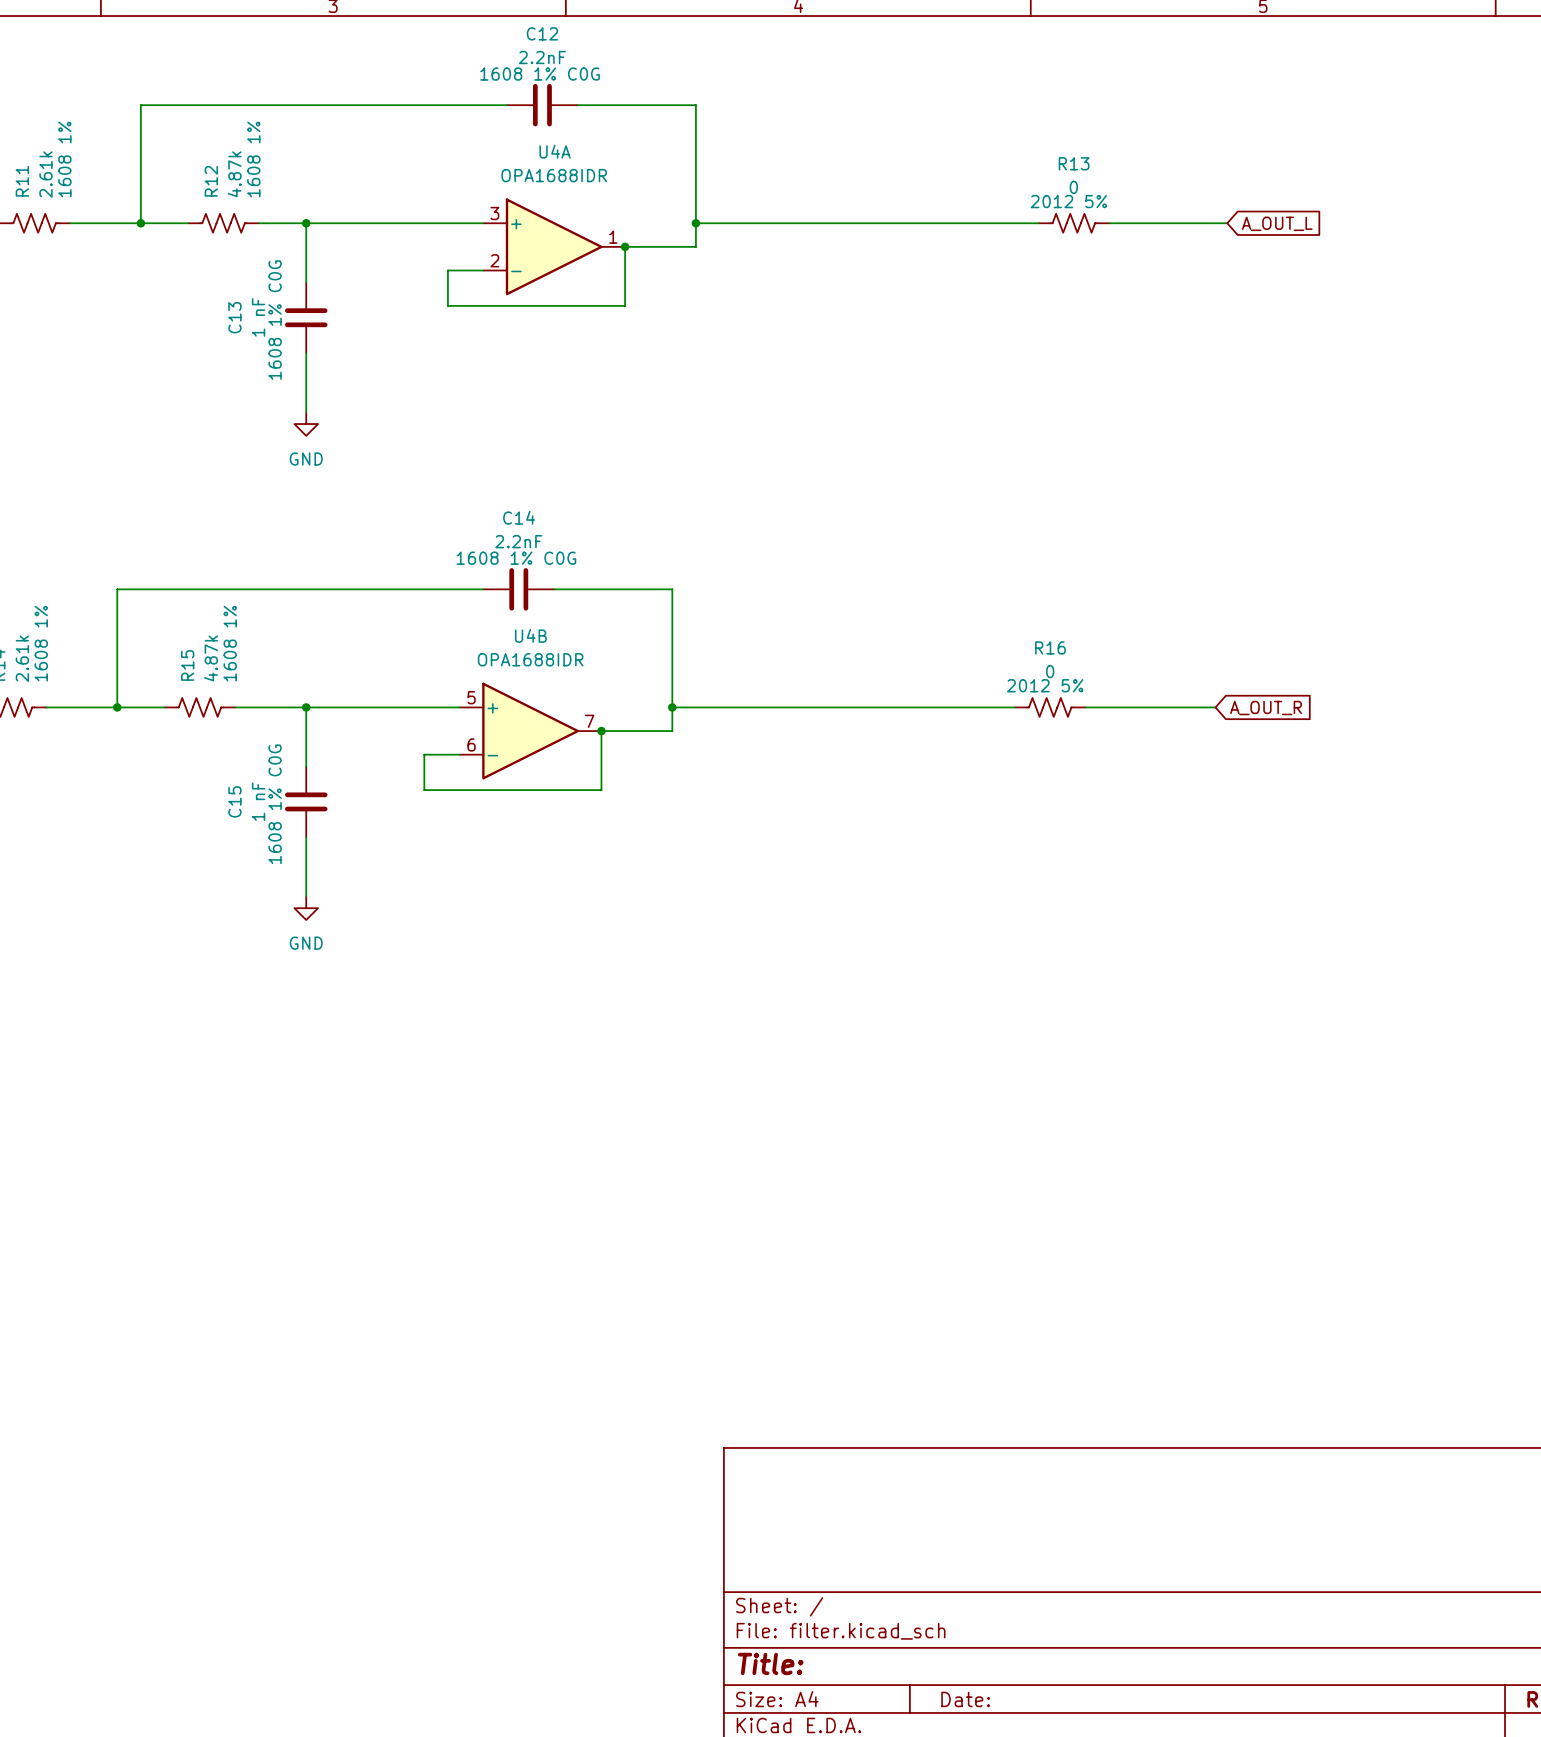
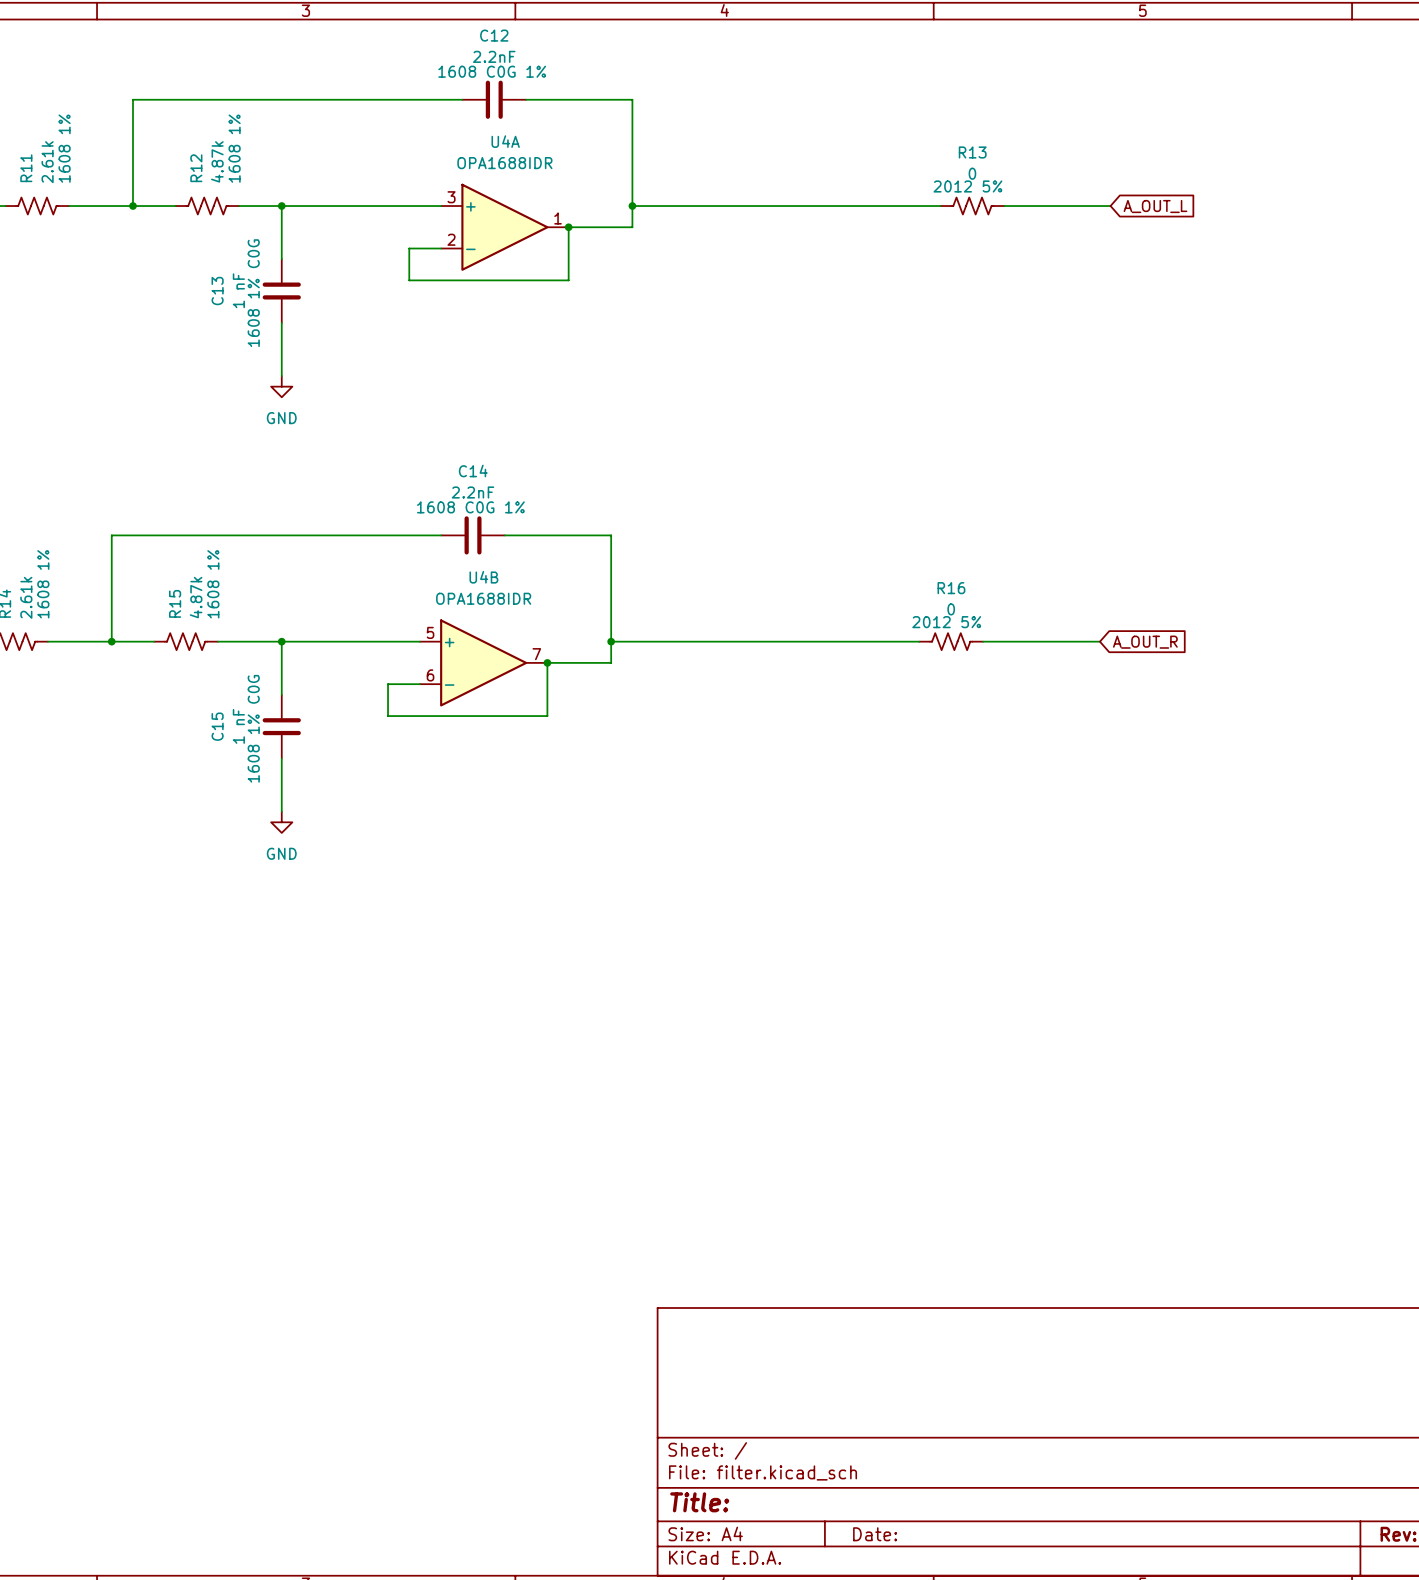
C12 text: 1608 1% C0G (540, 74) -> 1608 C0G 1% (492, 71)
C14 text: 1608 1% C0G (516, 558) -> 1608 C0G 1% (470, 507)

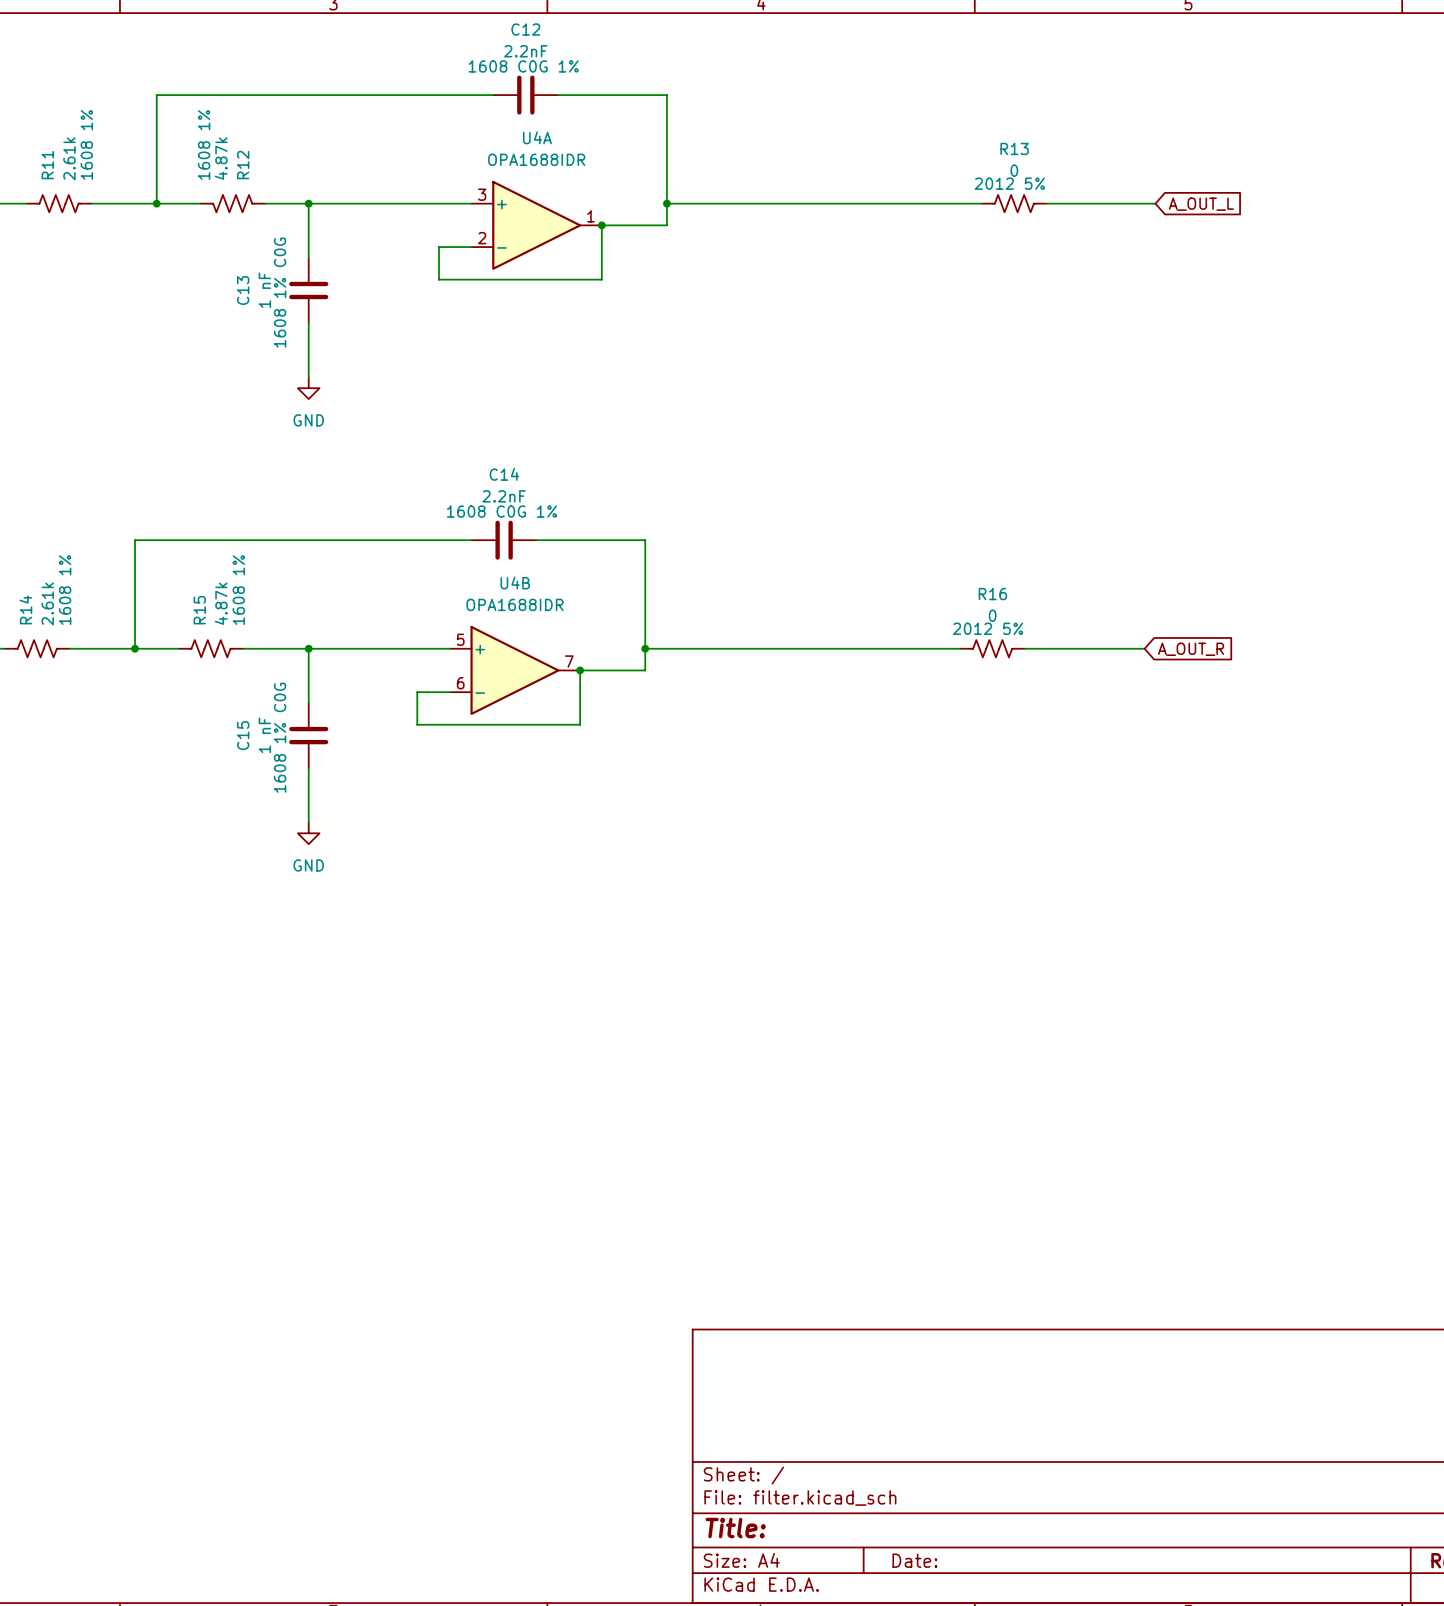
R12 flip: as is (207, 206) -> left-right (232, 203)

